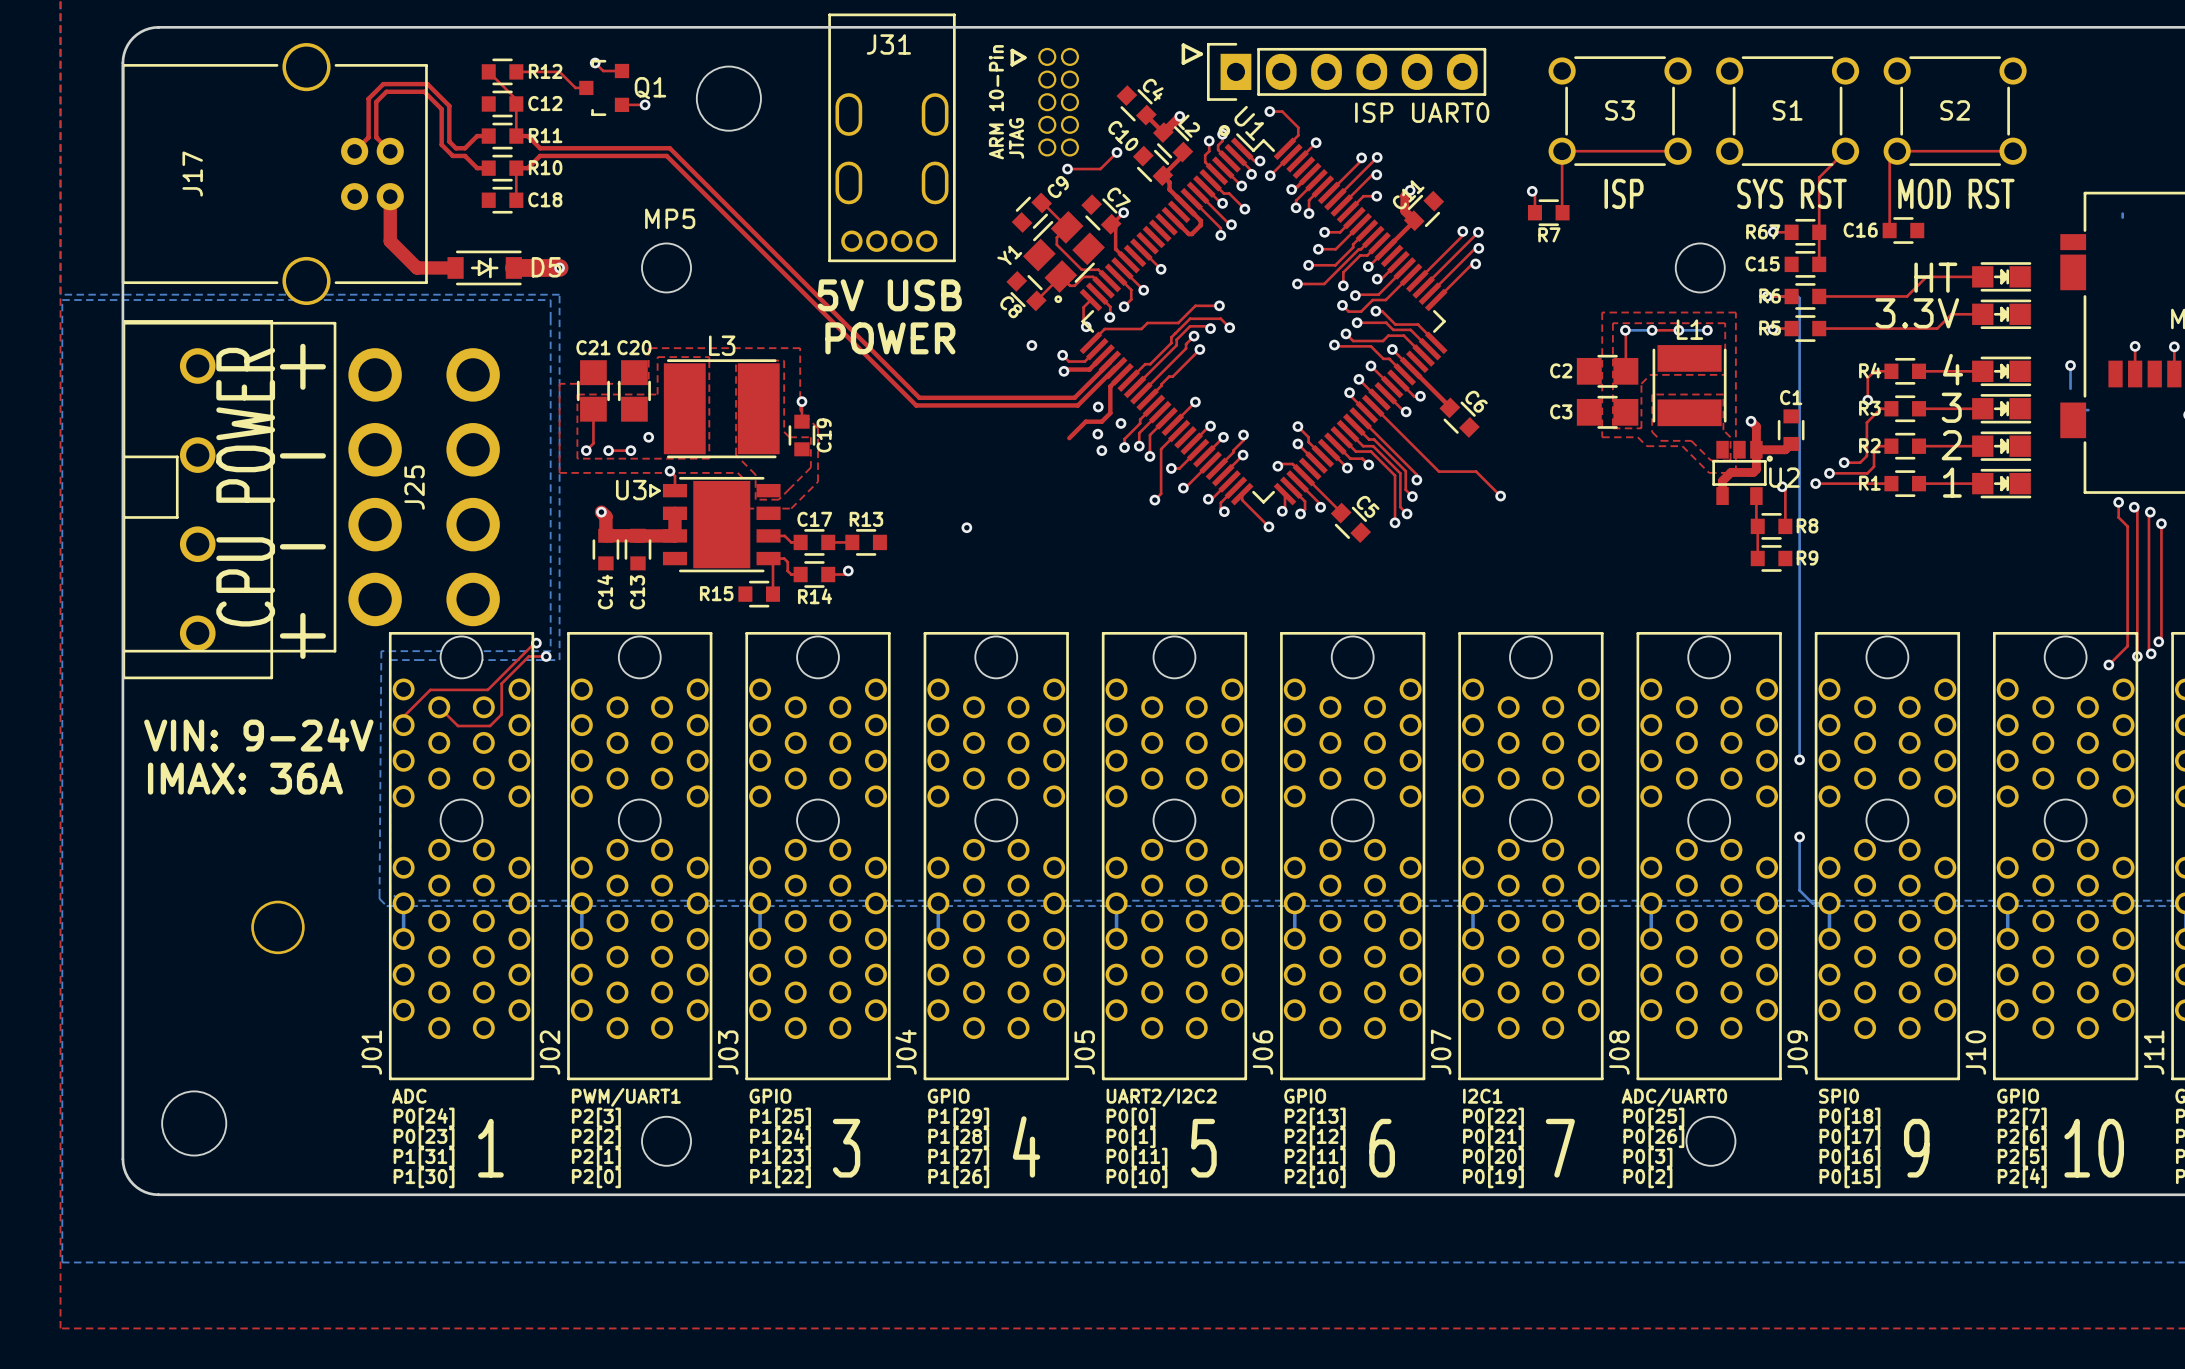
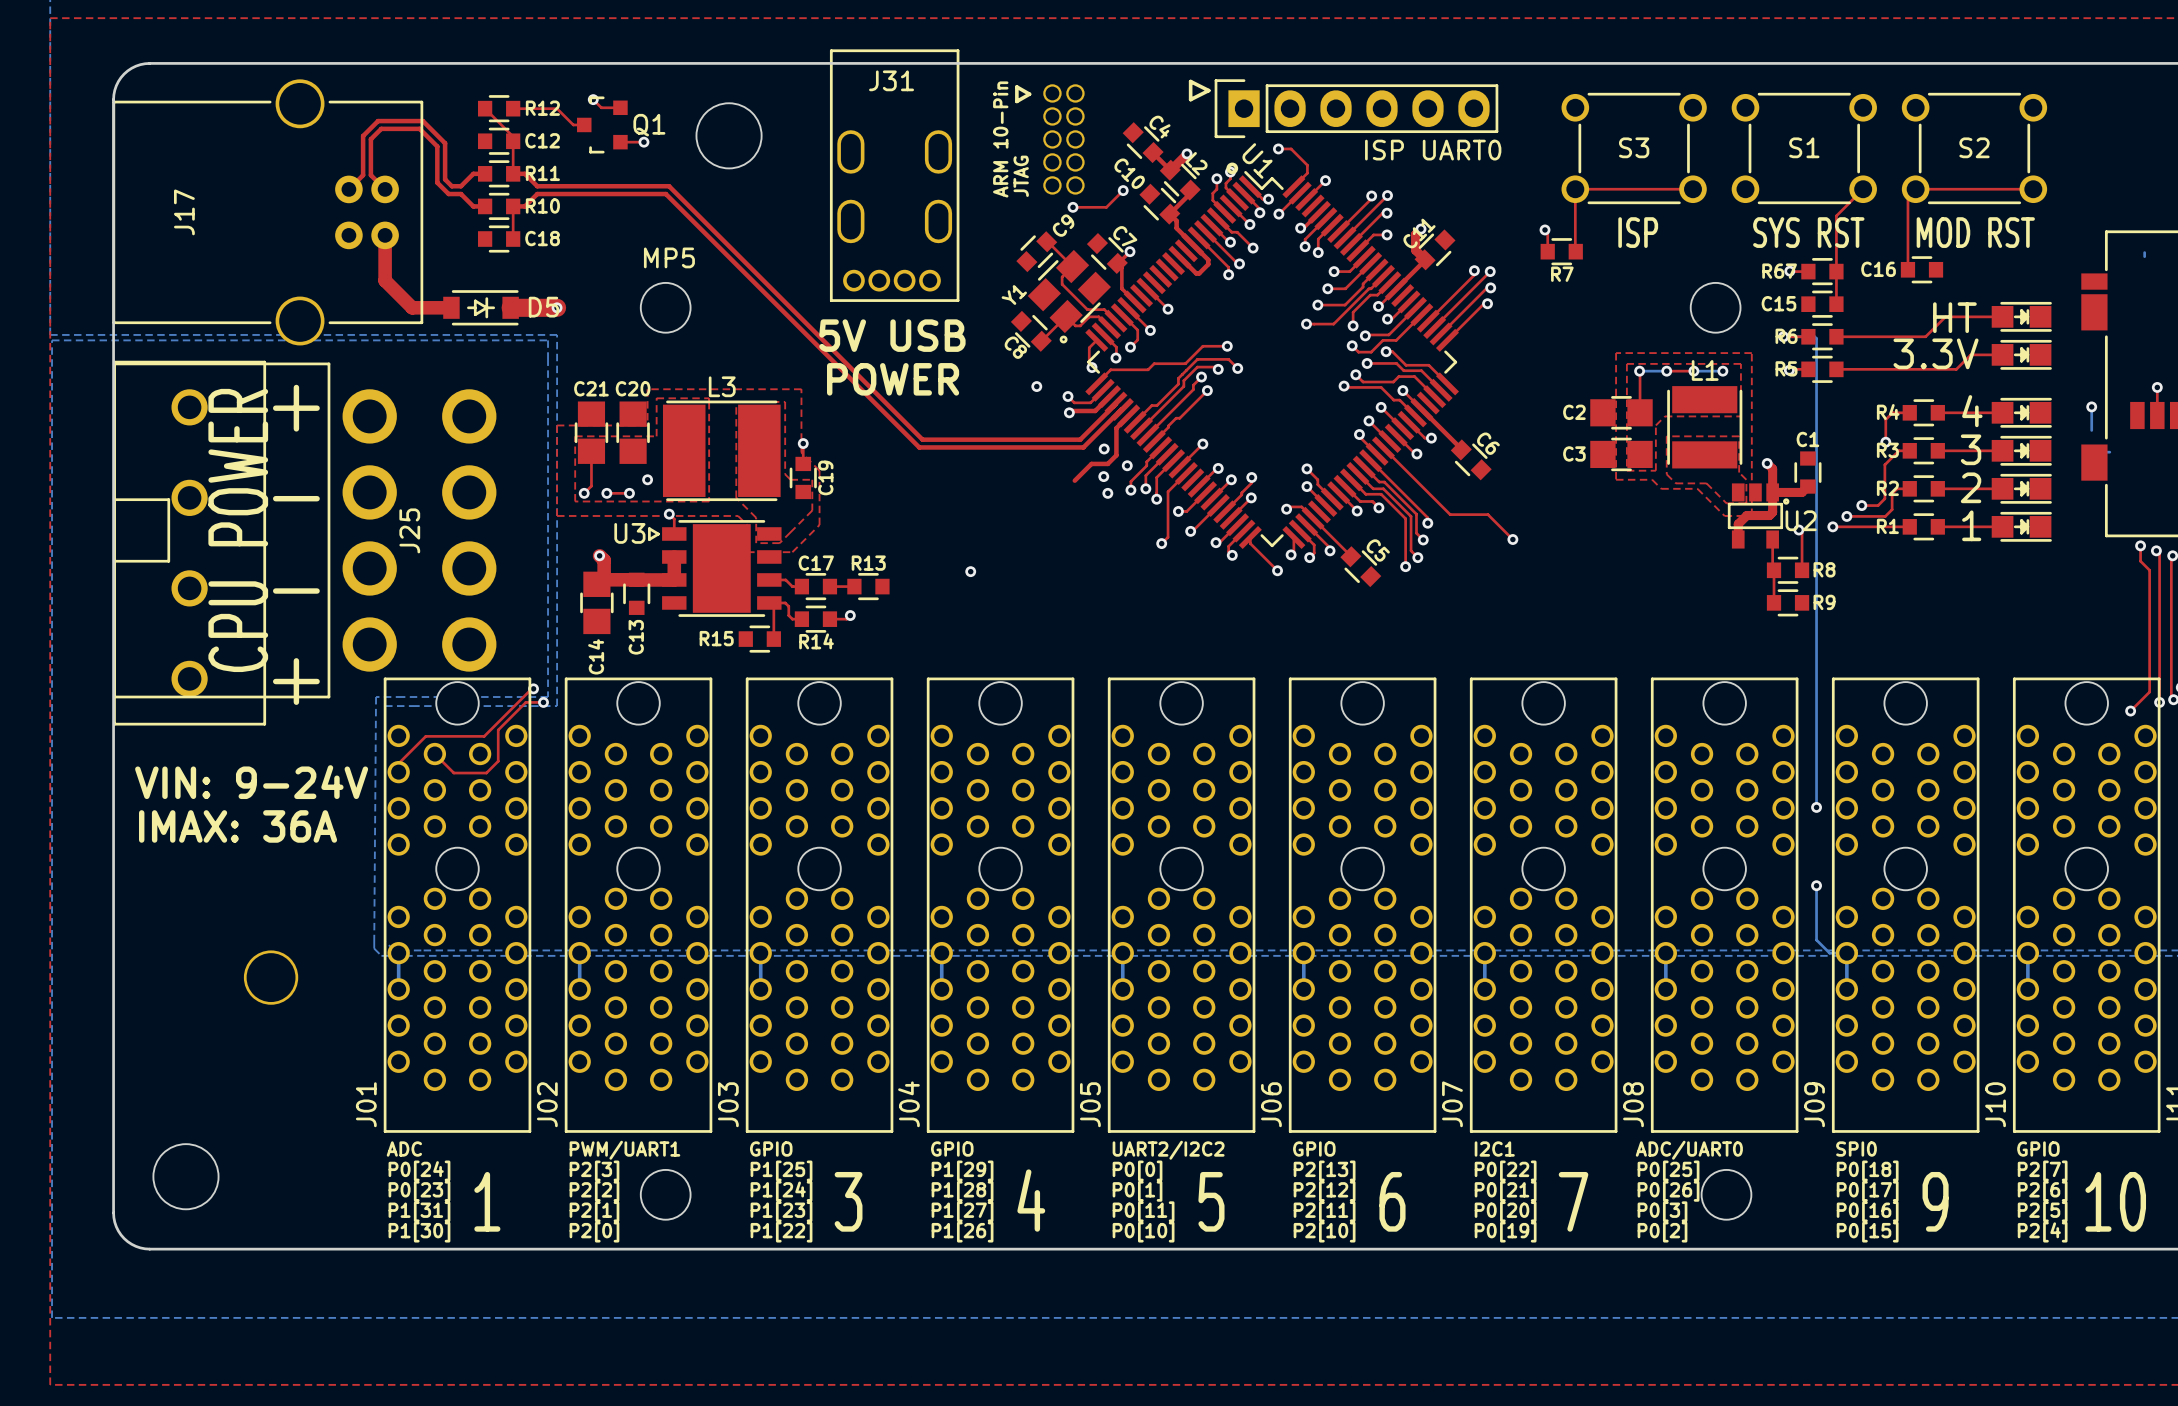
C14 footprint: [592, 528, 620, 571] -> [580, 571, 614, 635]

